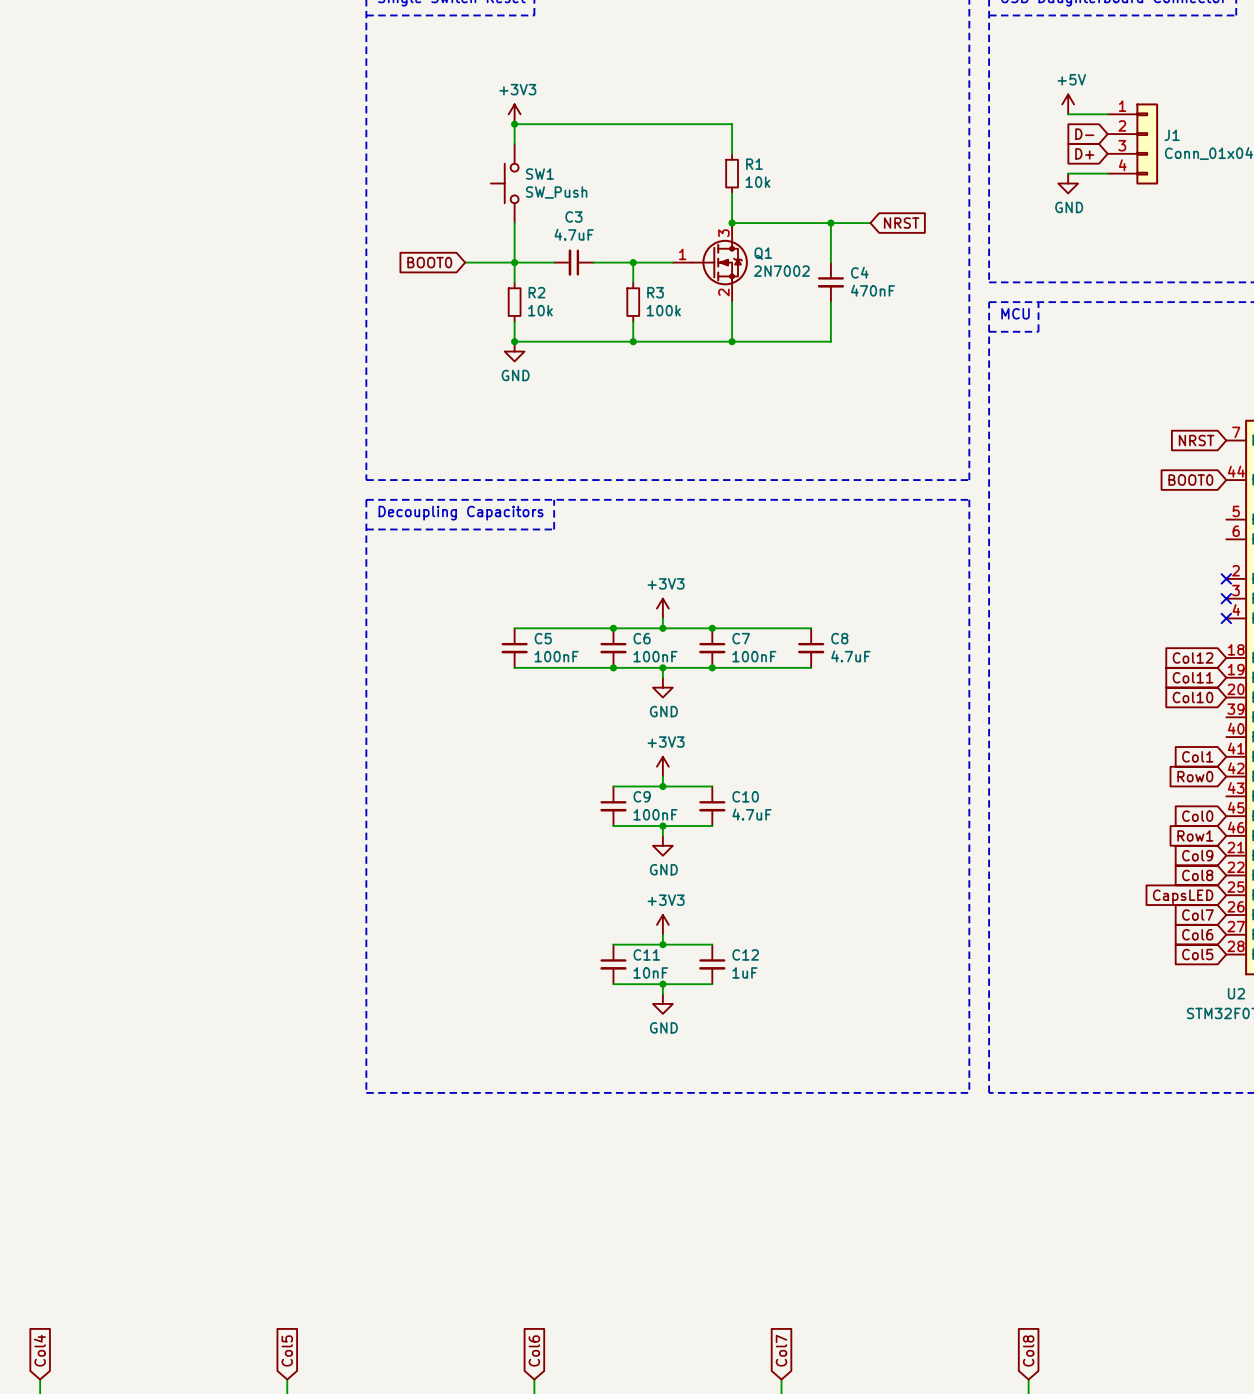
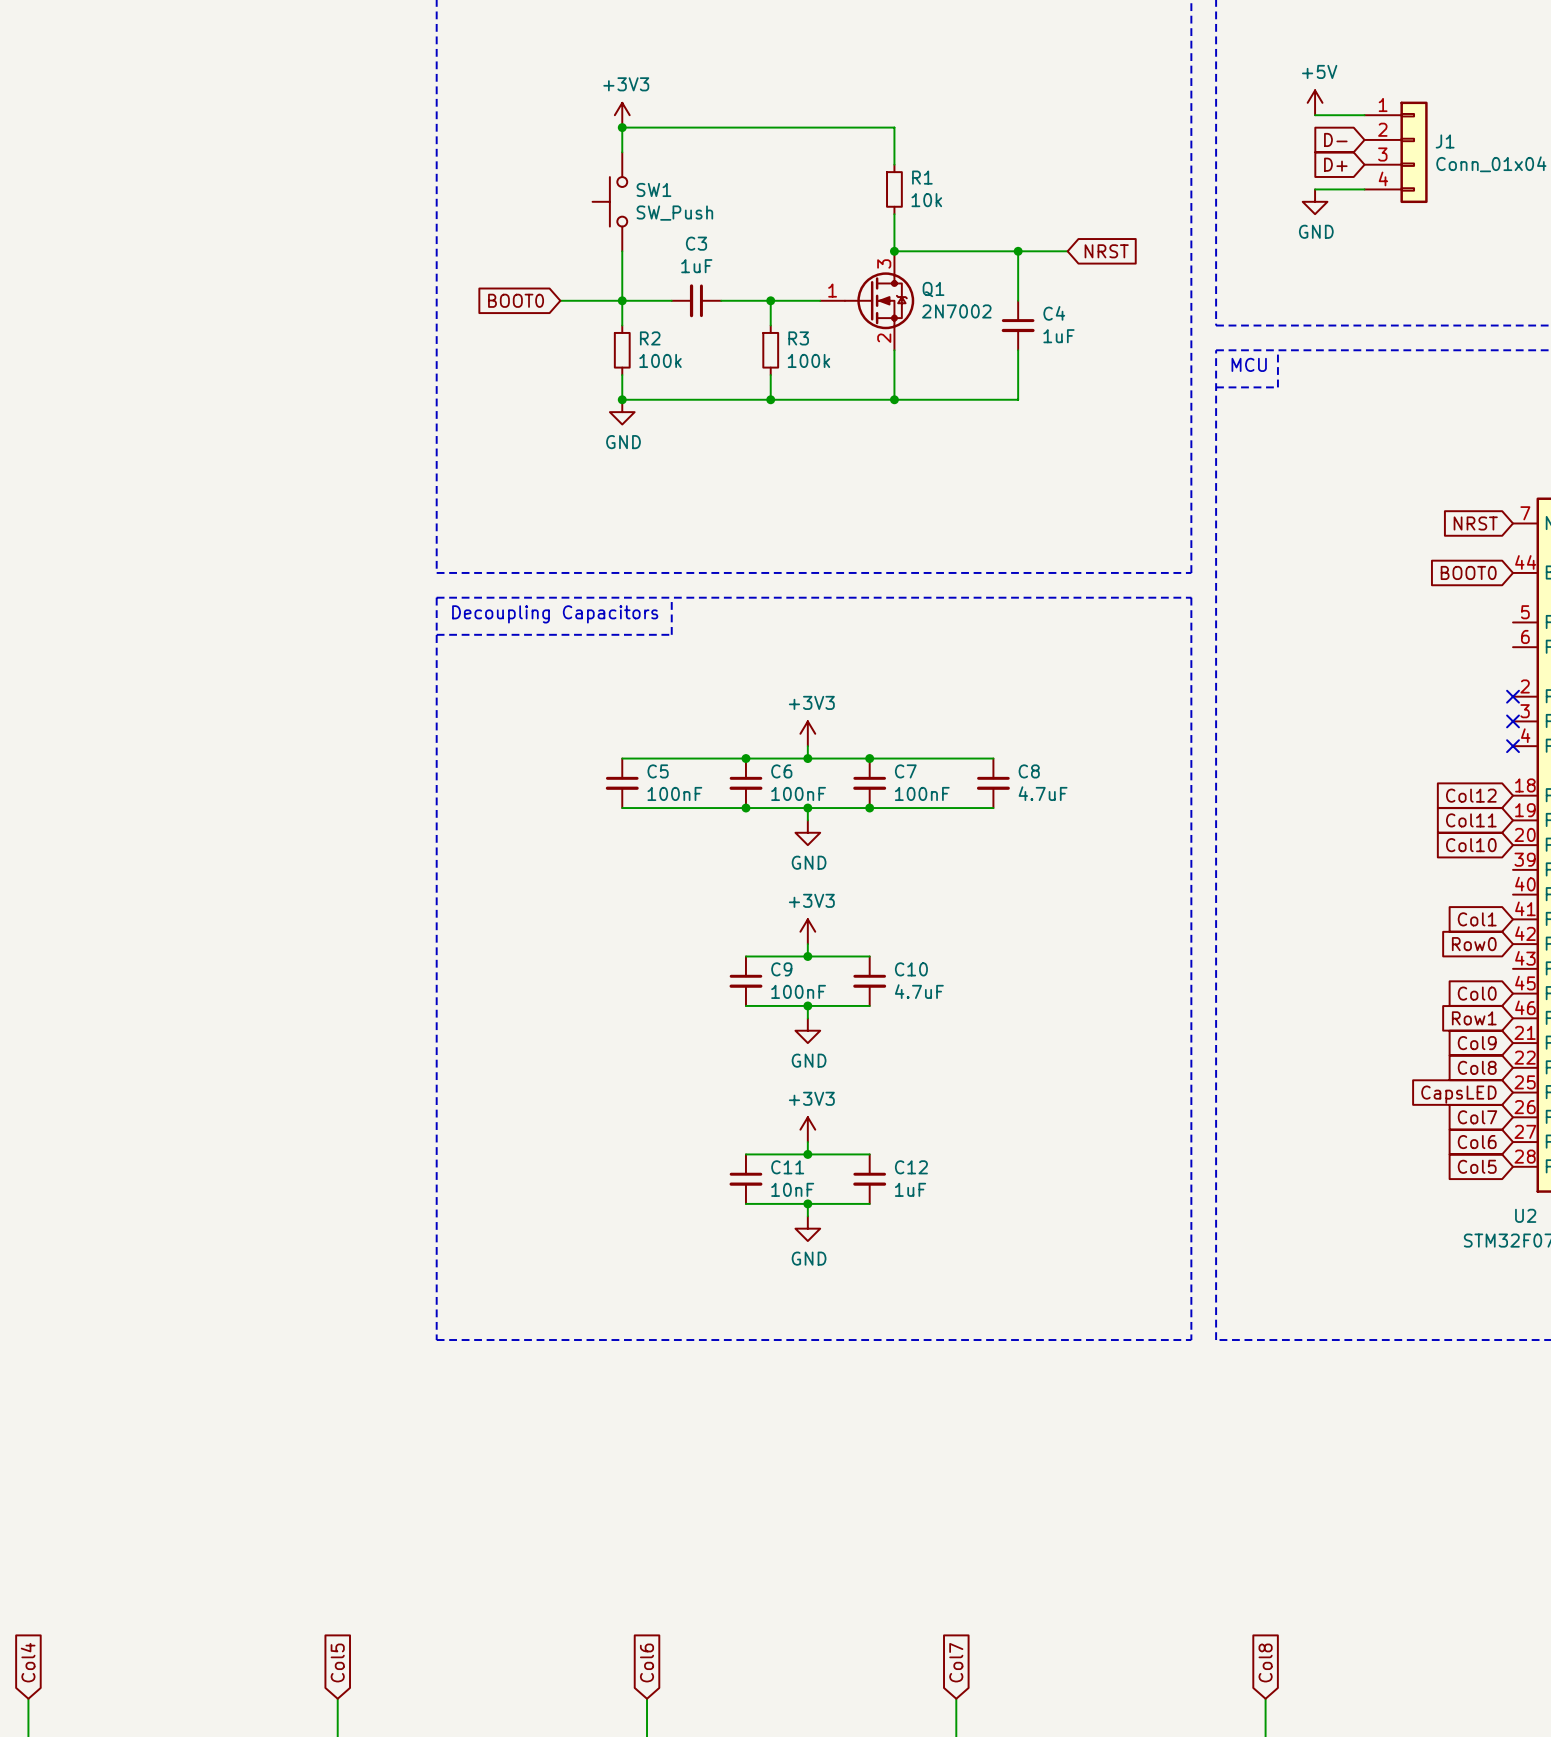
C3 value: 4.7uF (574, 234) -> 1uF (696, 266)
C4 value: 470nF (872, 290) -> 1uF (1058, 336)
R2 value: 10k (540, 310) -> 100k (660, 360)

